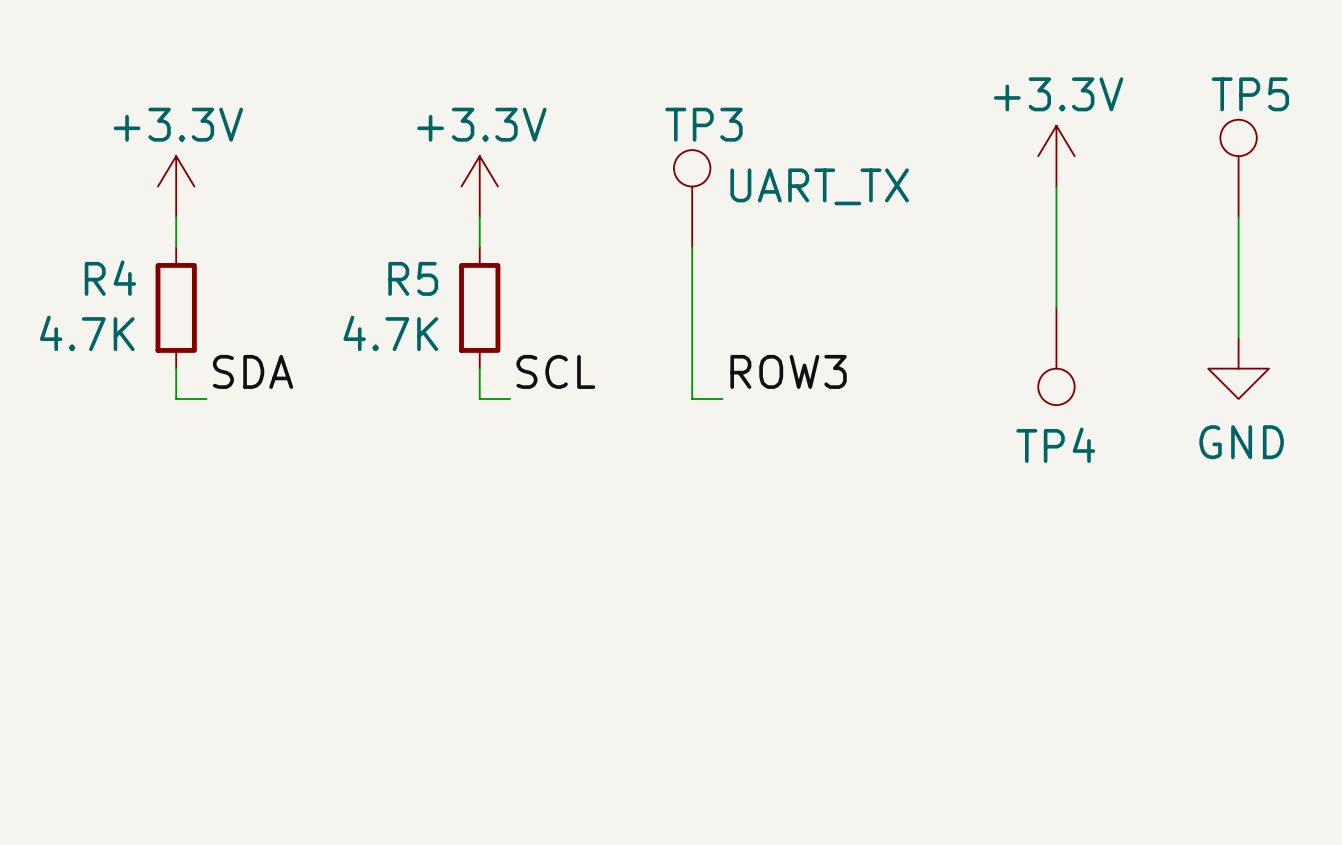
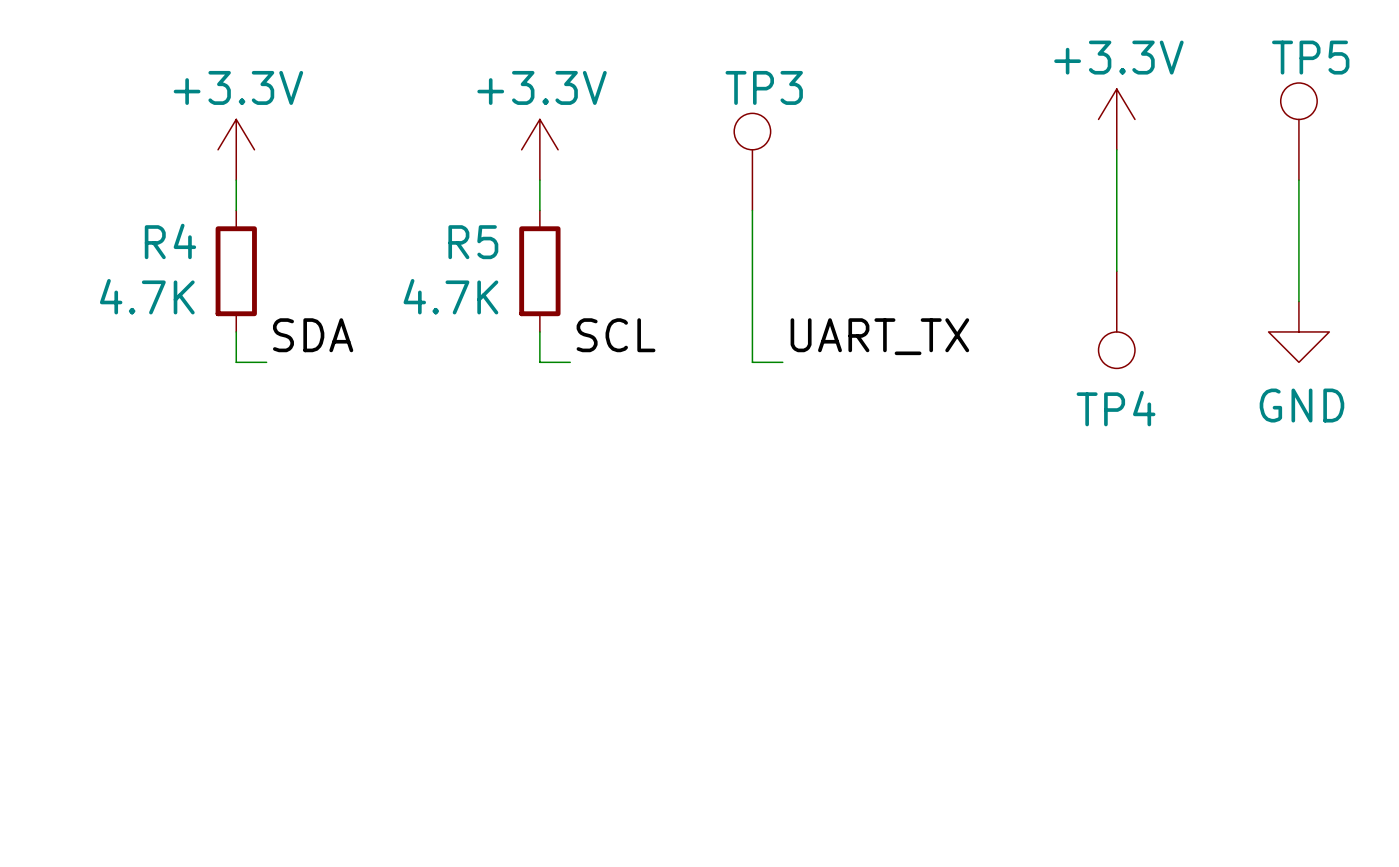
TP3 value: UART_TX (819, 186) -> none
label: ROW3 (788, 371) -> UART_TX (879, 336)

